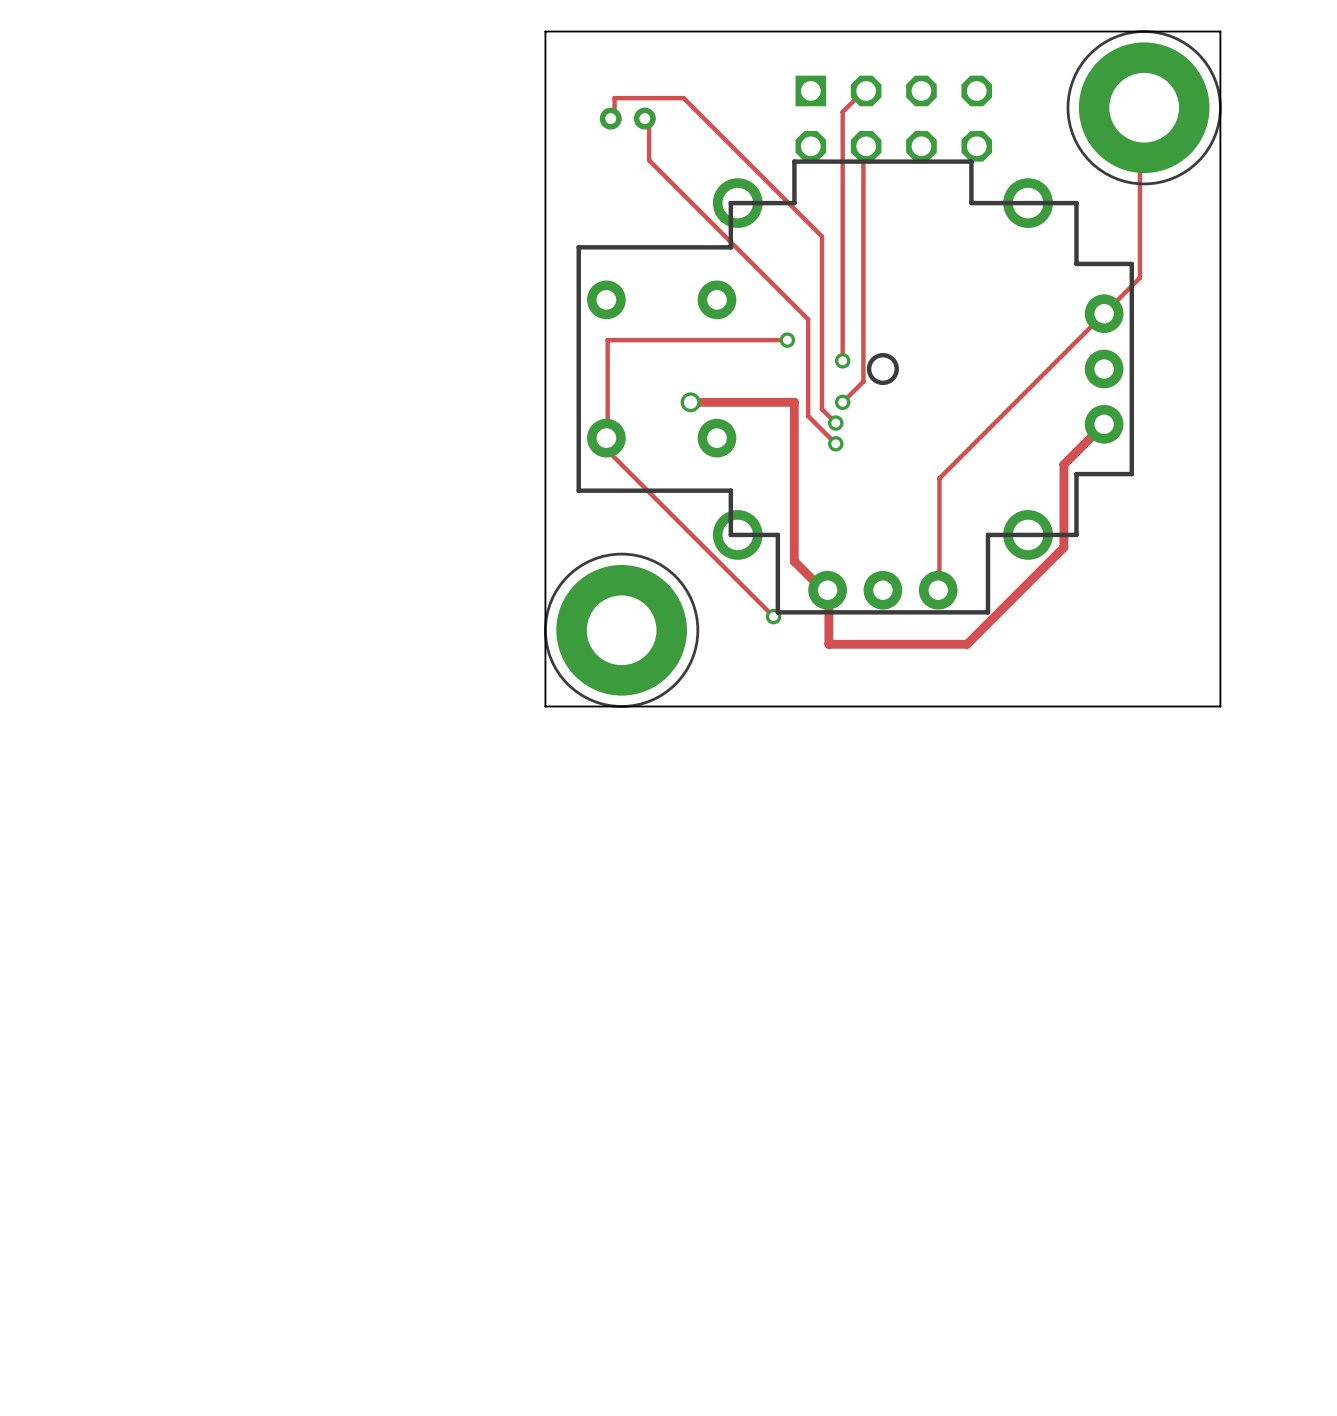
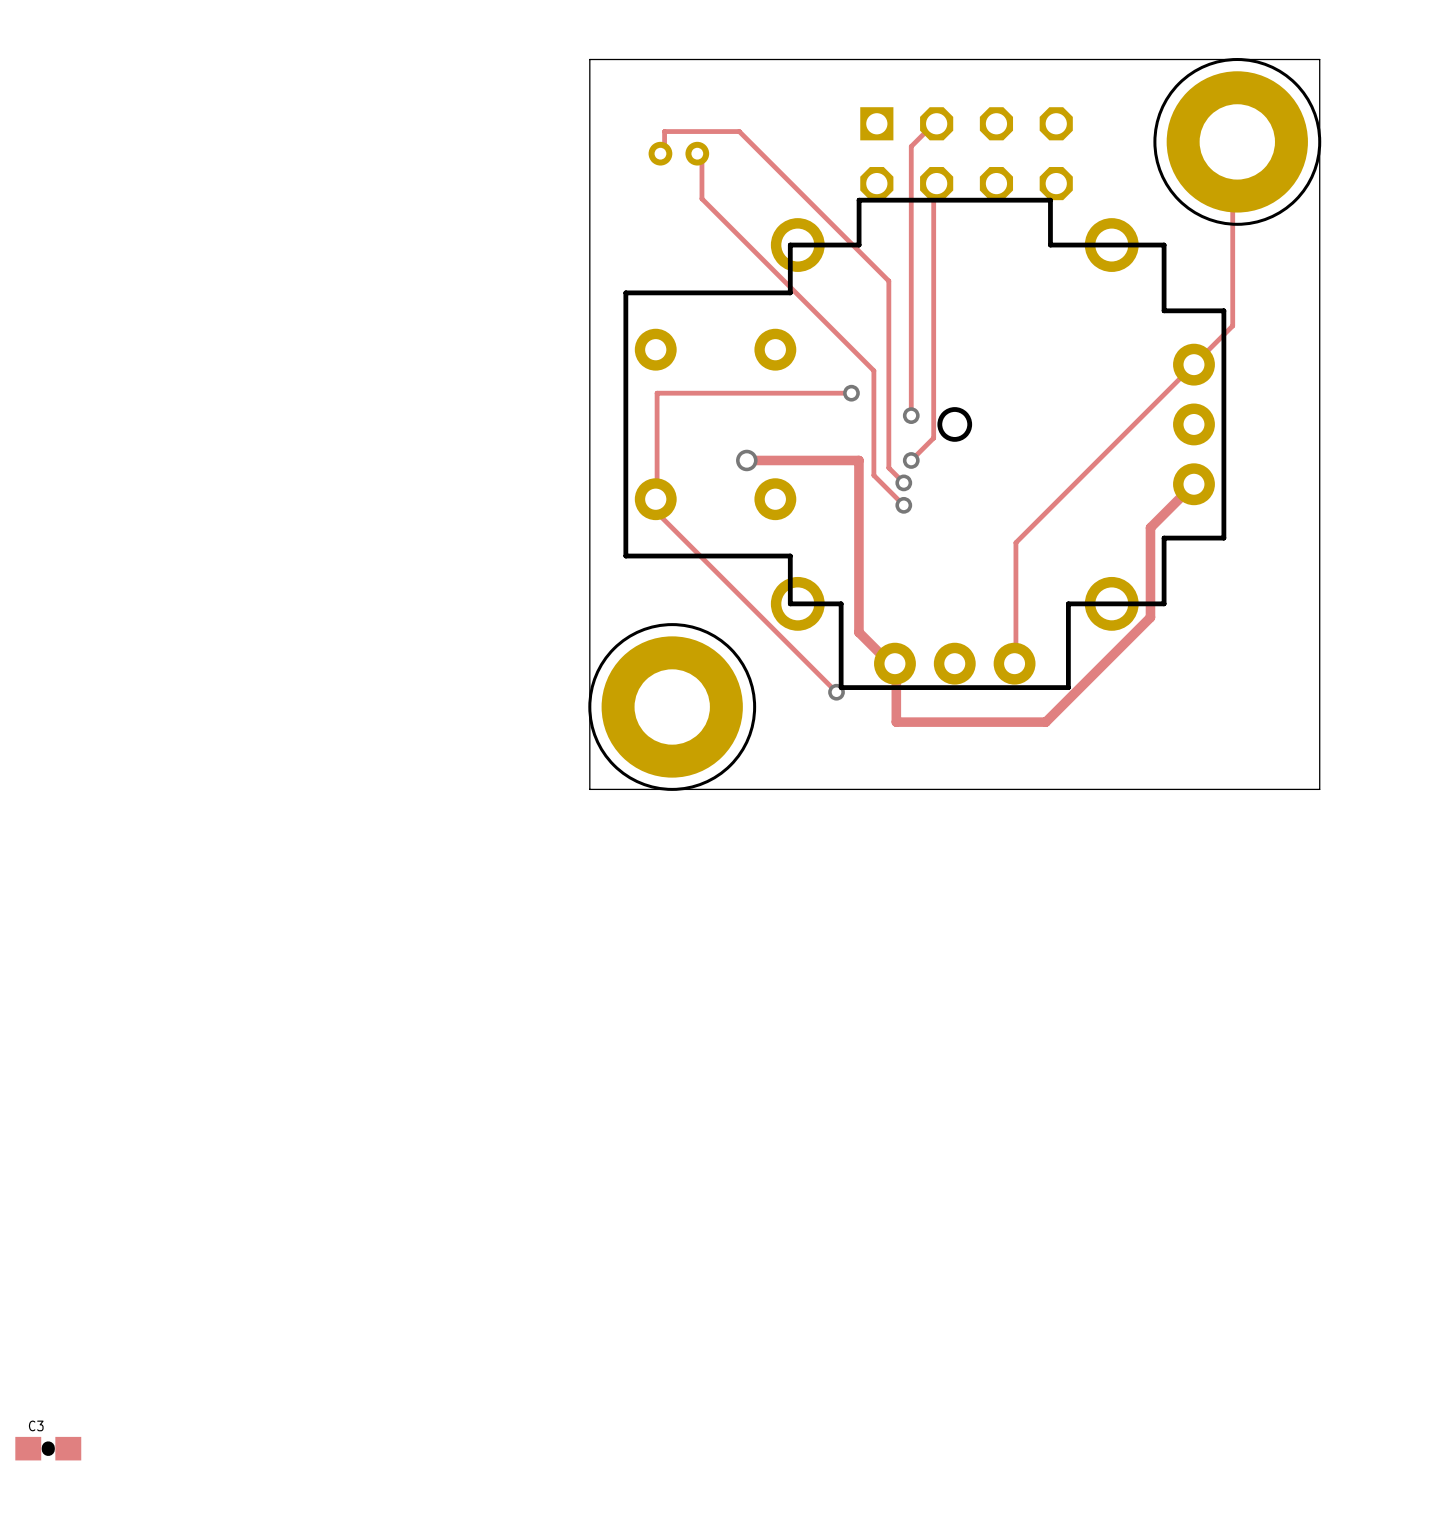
C3: none -> (48, 1448)

